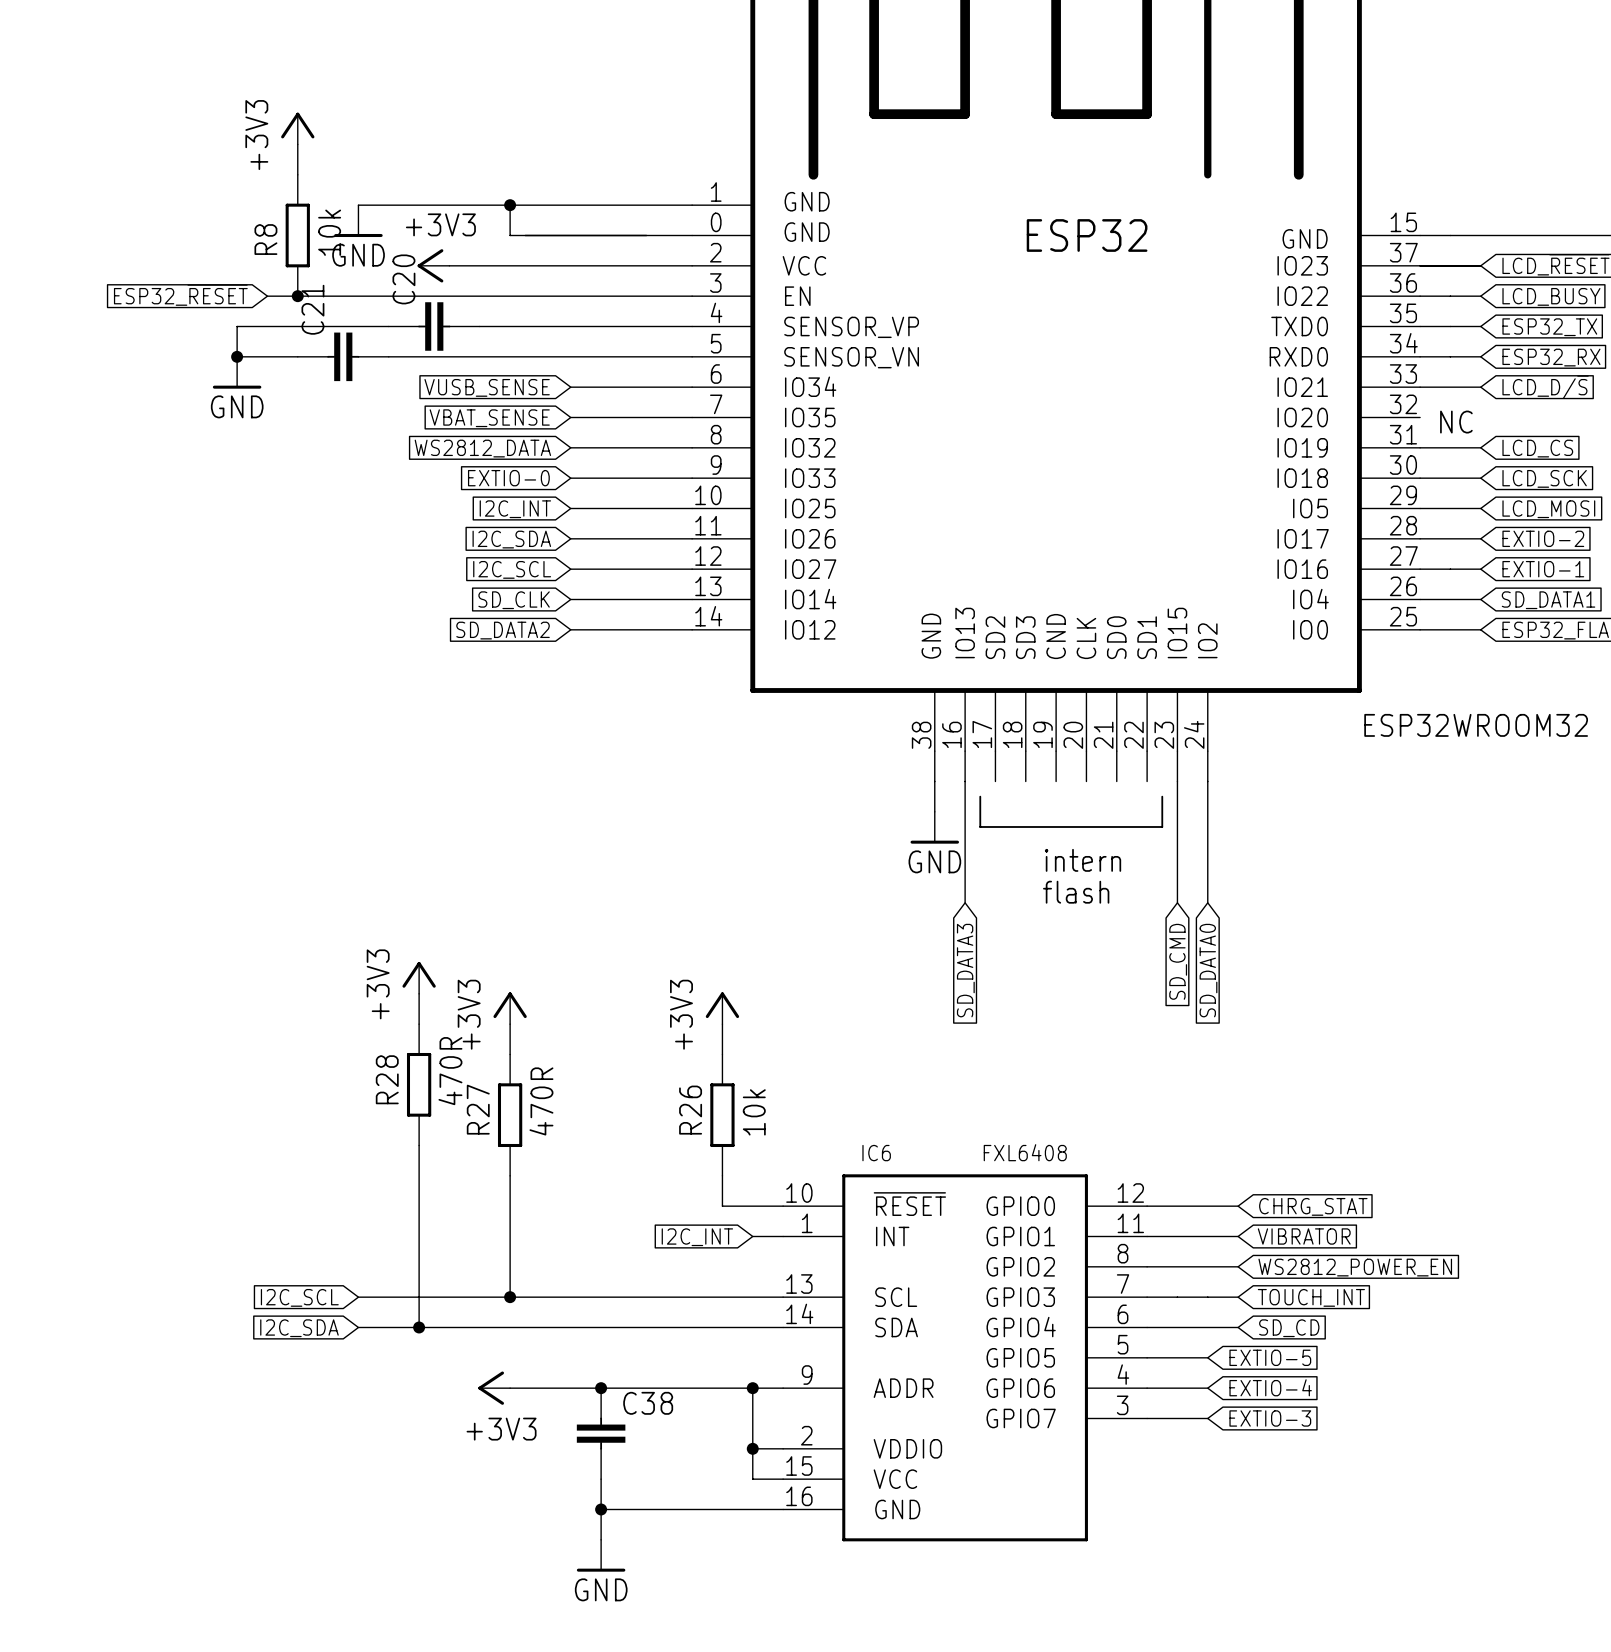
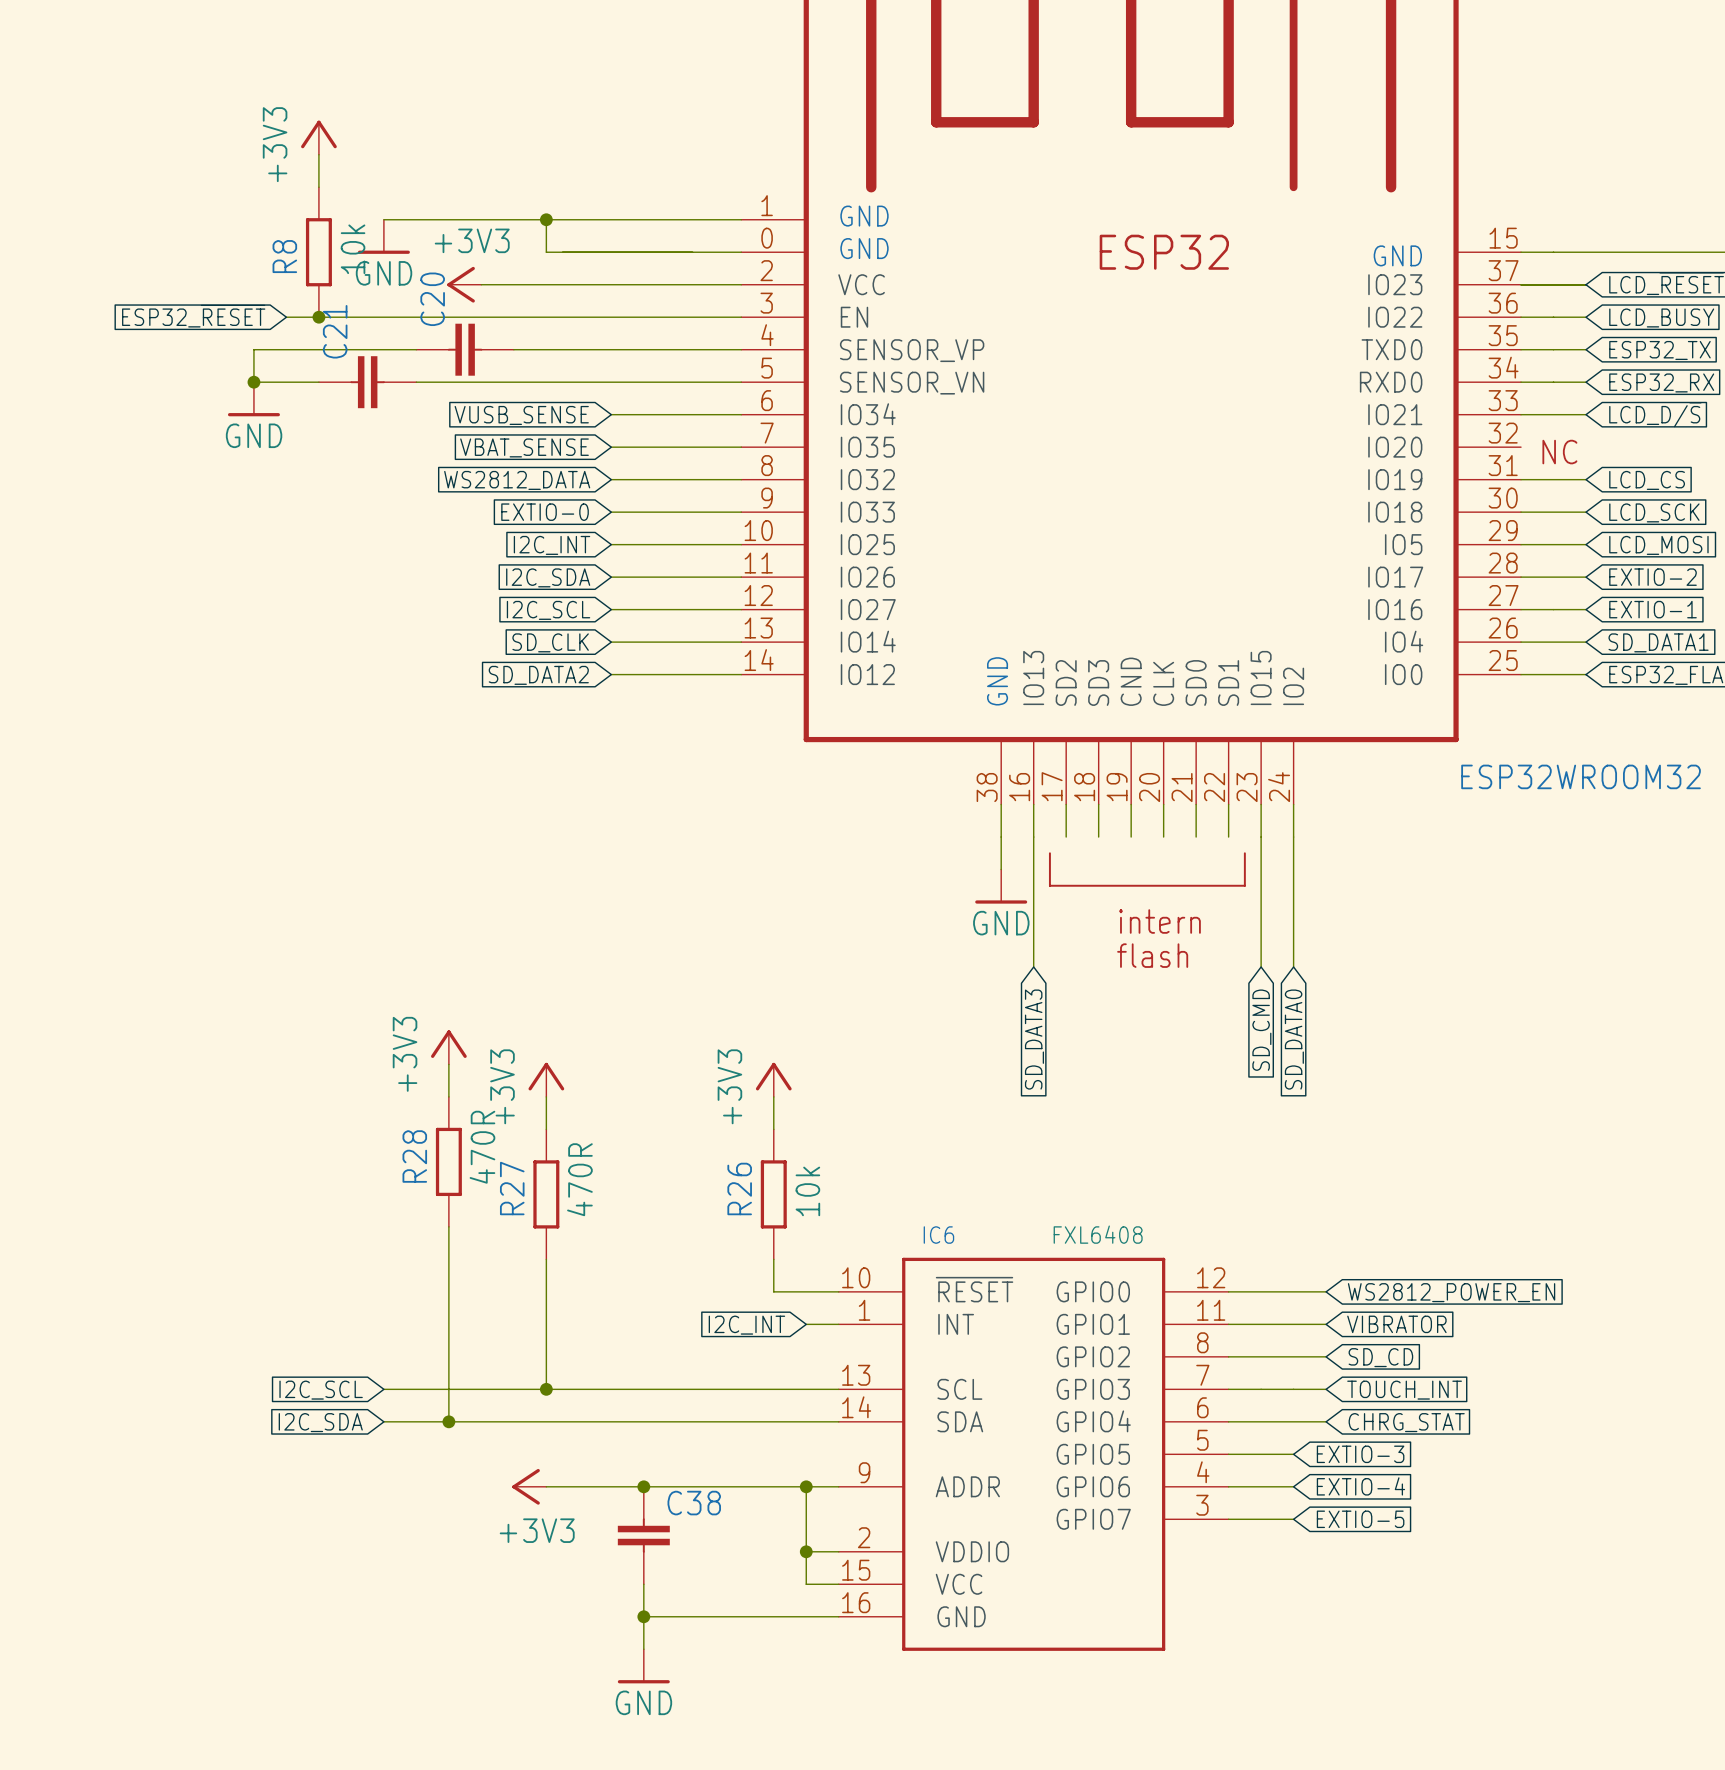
global label: CHRG_STAT (1313, 1206) -> WS2812_POWER_EN (1451, 1292)
global label: WS2812_POWER_EN (1355, 1267) -> SD_CD (1380, 1357)
global label: SD_CD (1289, 1328) -> CHRG_STAT (1406, 1422)
global label: EXTIO-5 (1270, 1357) -> EXTIO-3 (1360, 1454)
global label: EXTIO-3 (1270, 1418) -> EXTIO-5 (1360, 1519)

